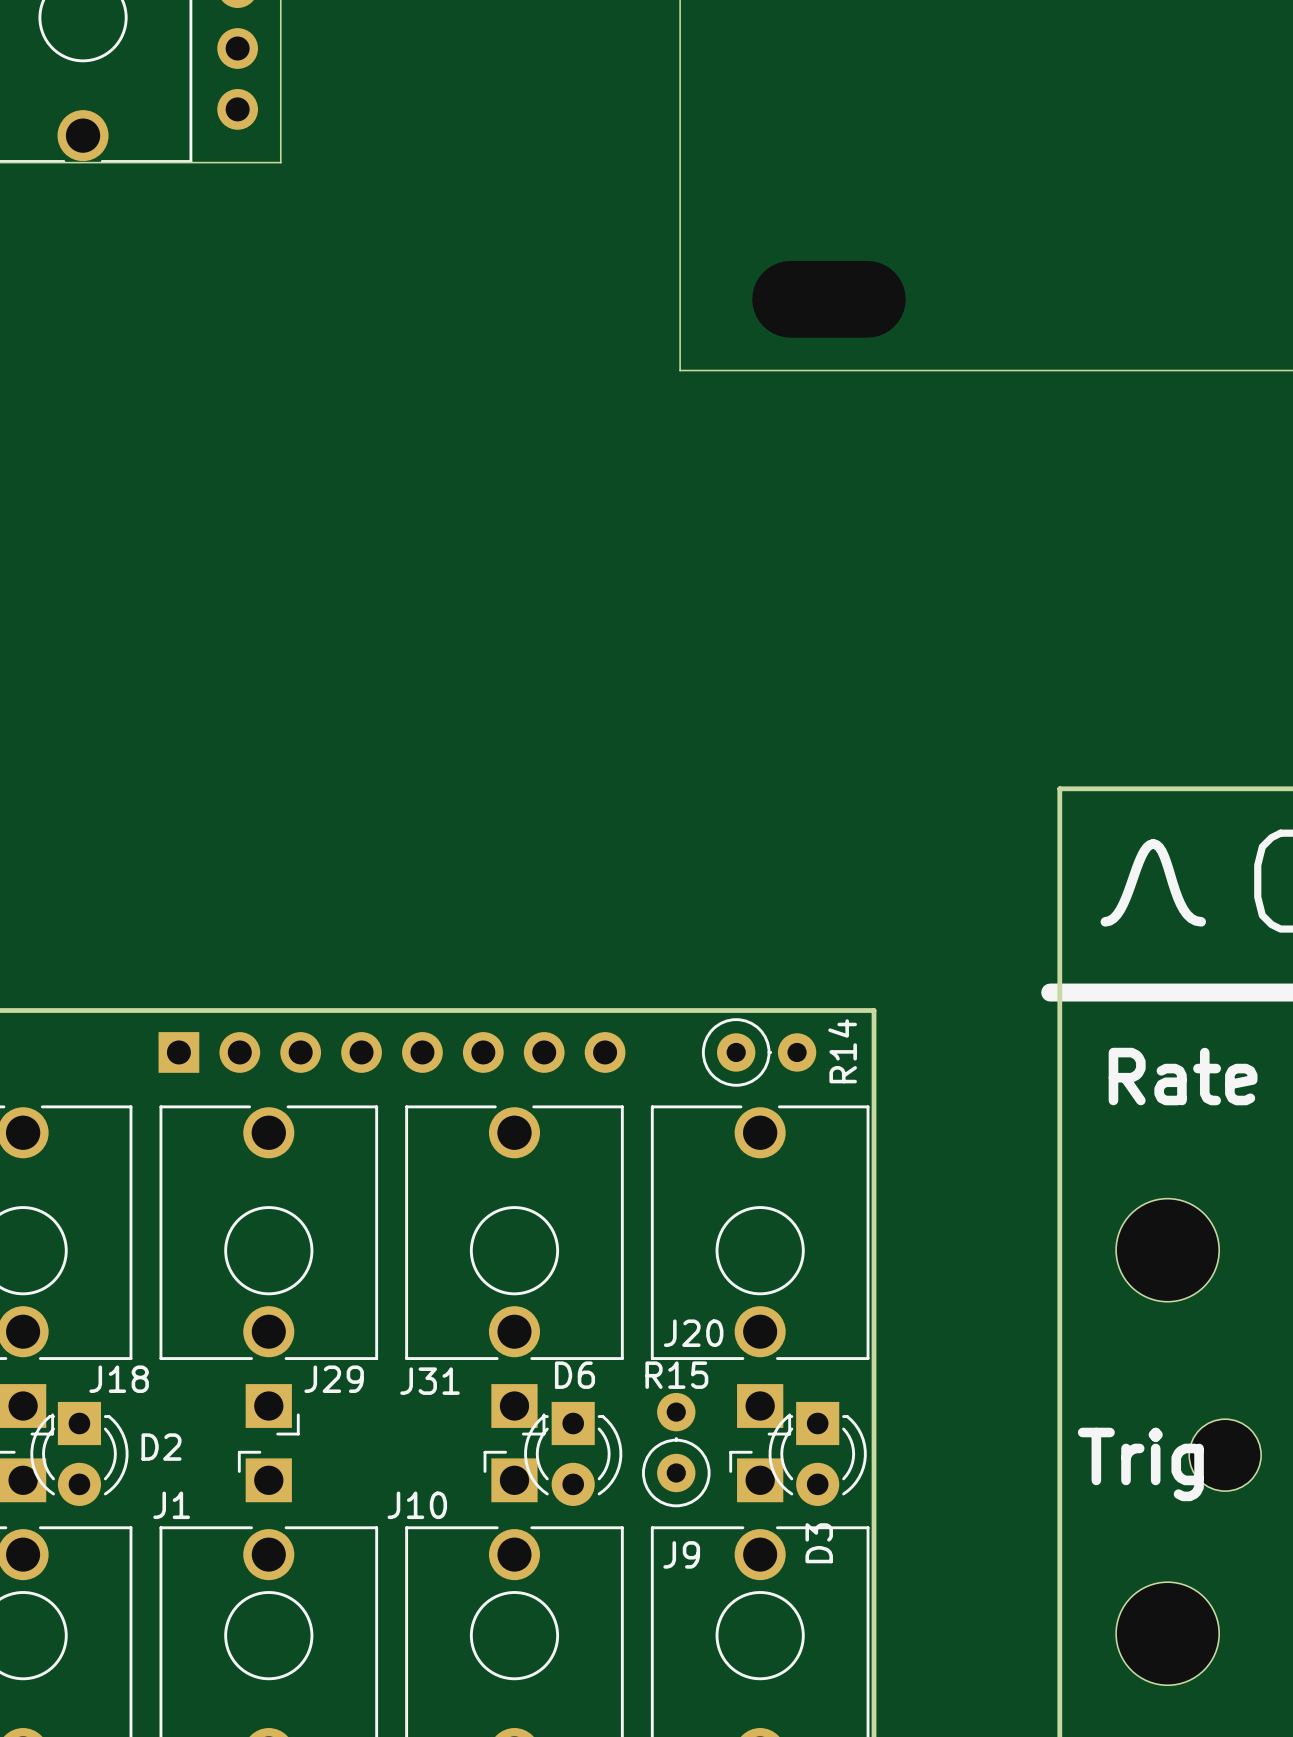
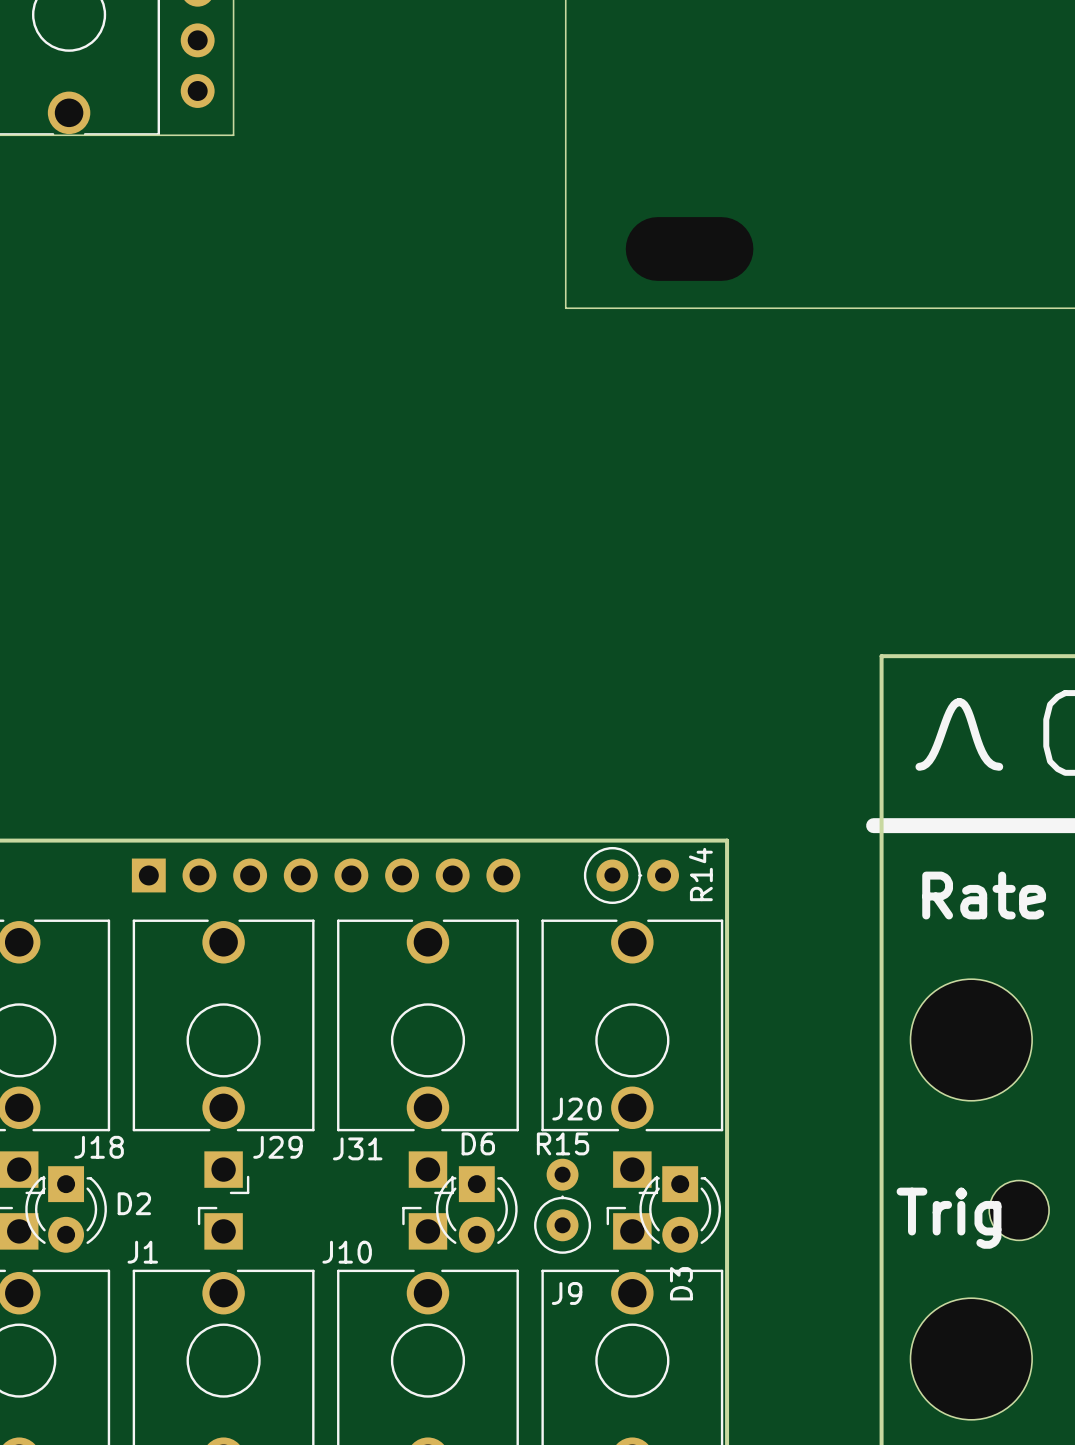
part footprint: [1116, 1198, 1220, 1302] -> [910, 979, 1033, 1101]
part footprint: [1116, 1582, 1220, 1686] -> [910, 1298, 1033, 1420]

